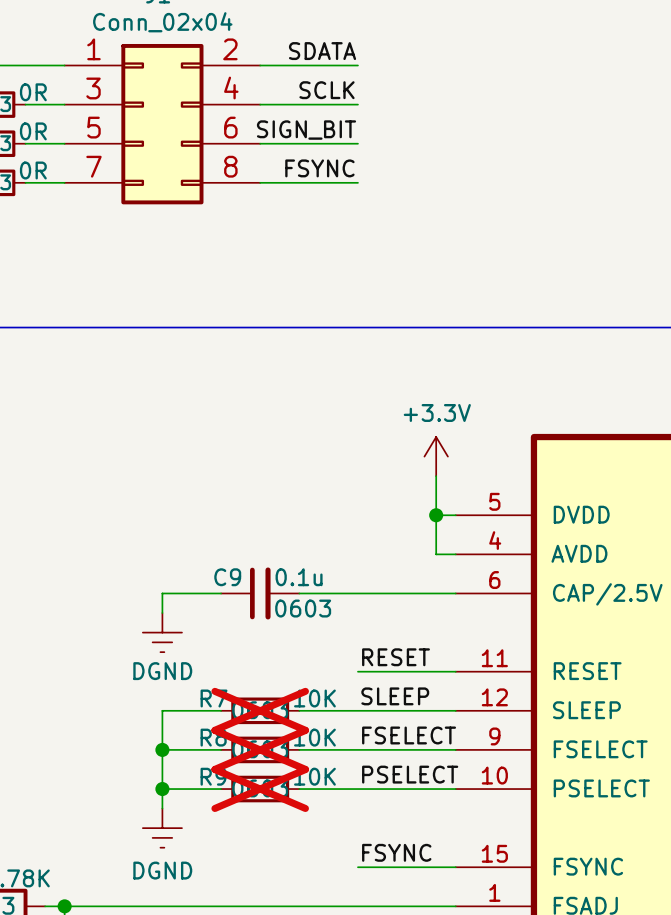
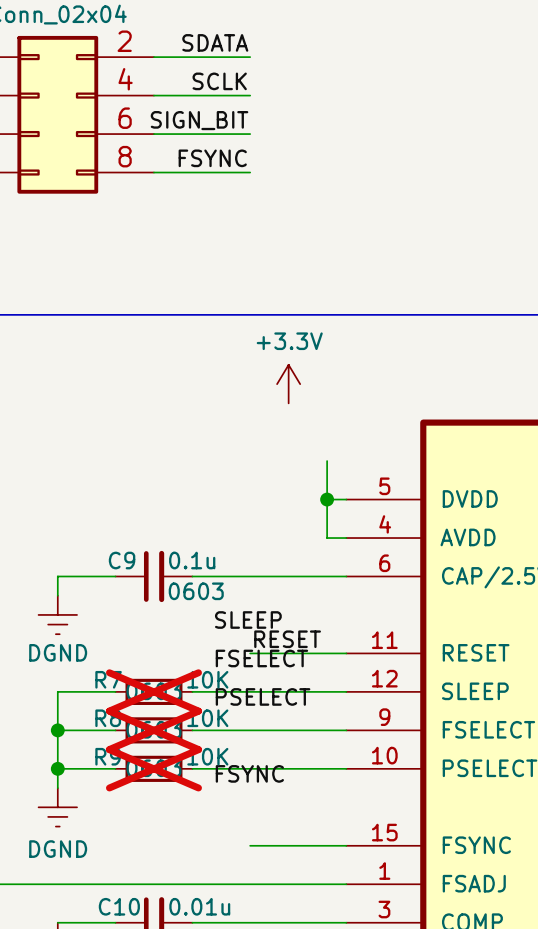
power symbol position: +3.3V (436, 456) -> +3.3V (288, 384)
label position: SLEEP (395, 696) -> SLEEP (248, 620)
label position: FSELECT (409, 735) -> FSELECT (261, 658)
label position: PSELECT (410, 774) -> PSELECT (263, 696)
label position: FSYNC (396, 852) -> FSYNC (249, 773)

